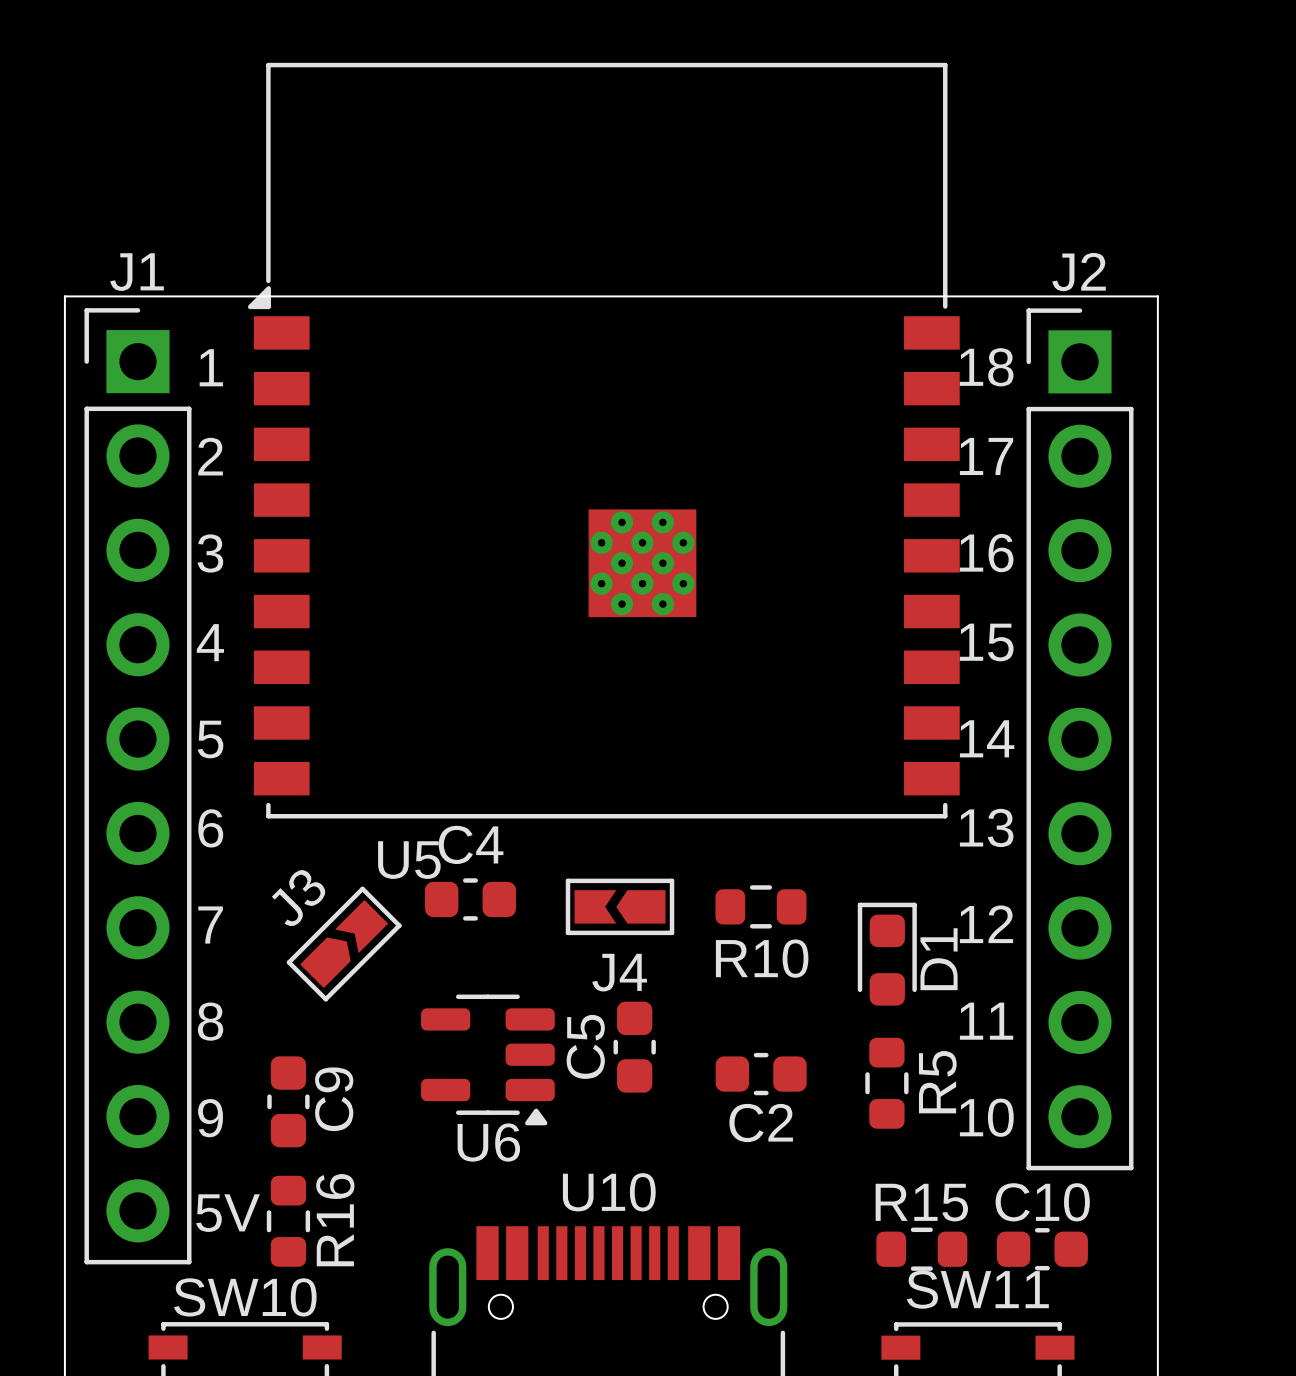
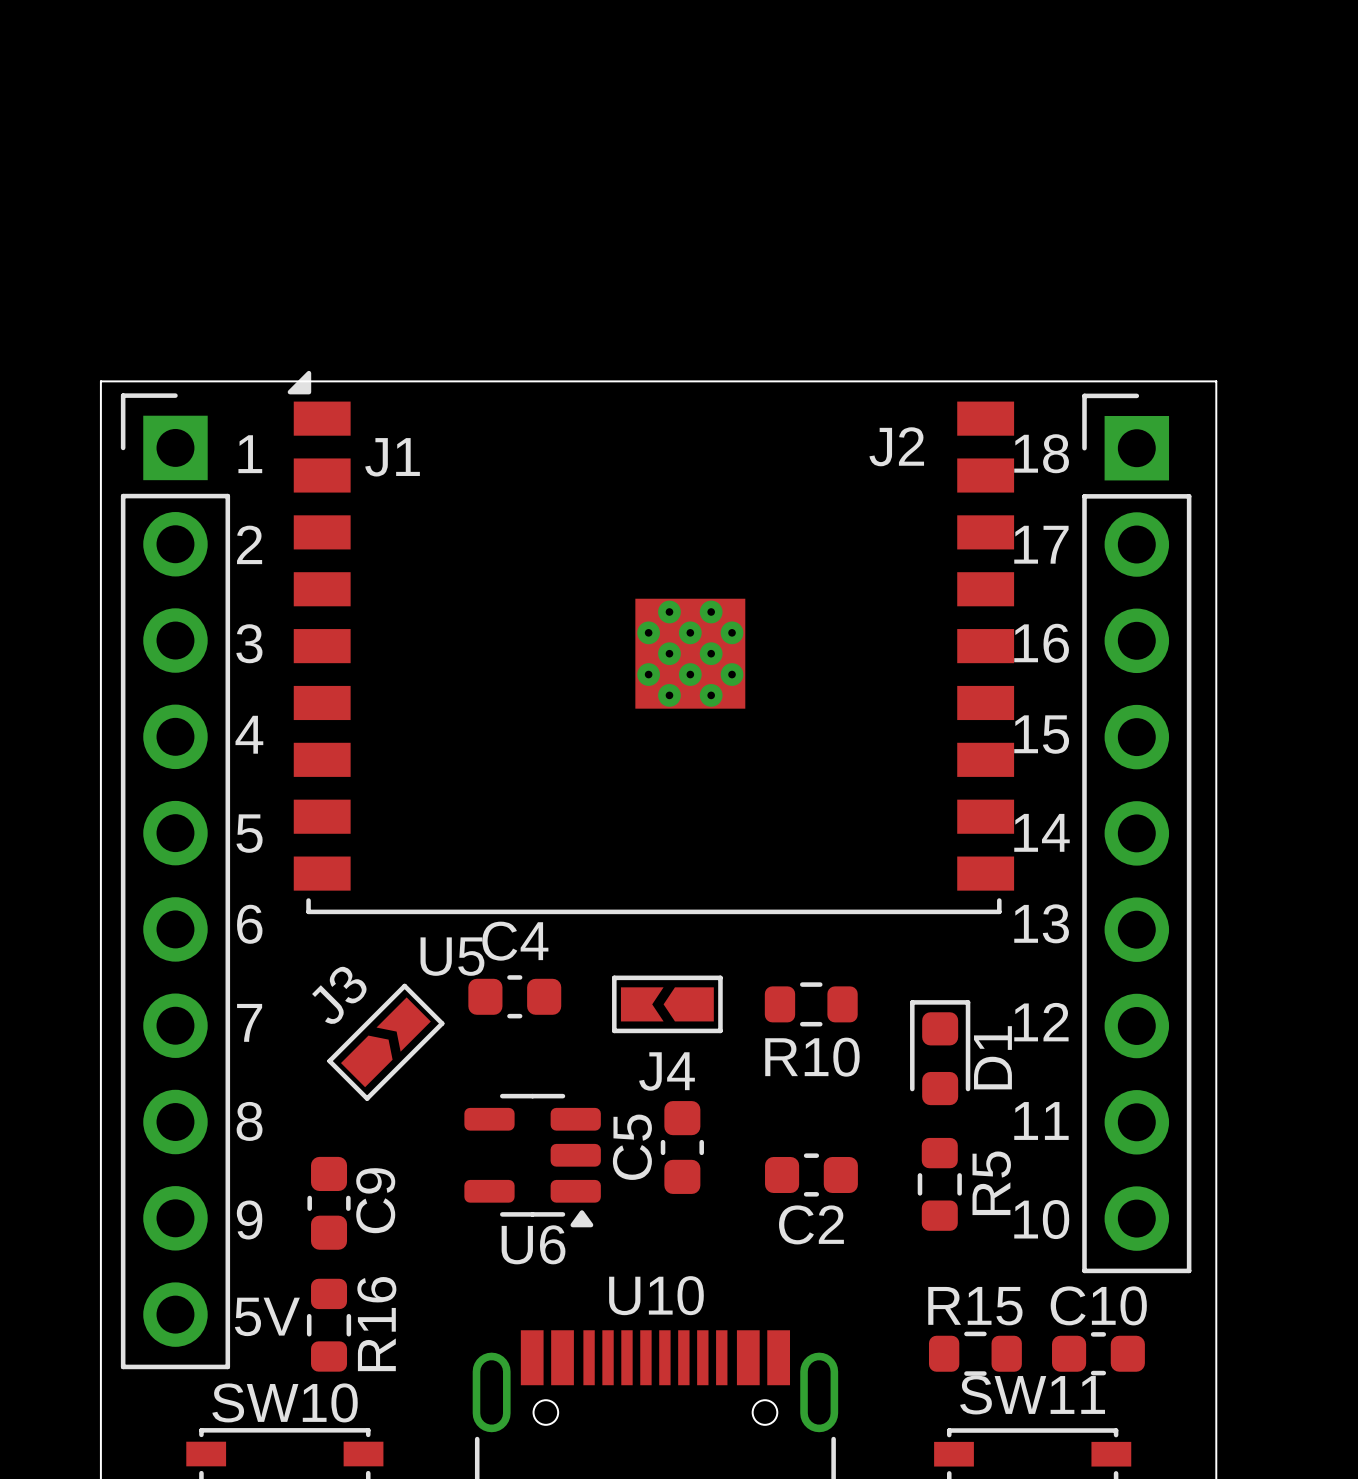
U5 footprint: [247, 62, 960, 819] -> [287, 370, 1015, 915]
J1 name position: J1 (137, 272) -> J1 (392, 457)
J2 name position: J2 (1079, 272) -> J2 (896, 446)

